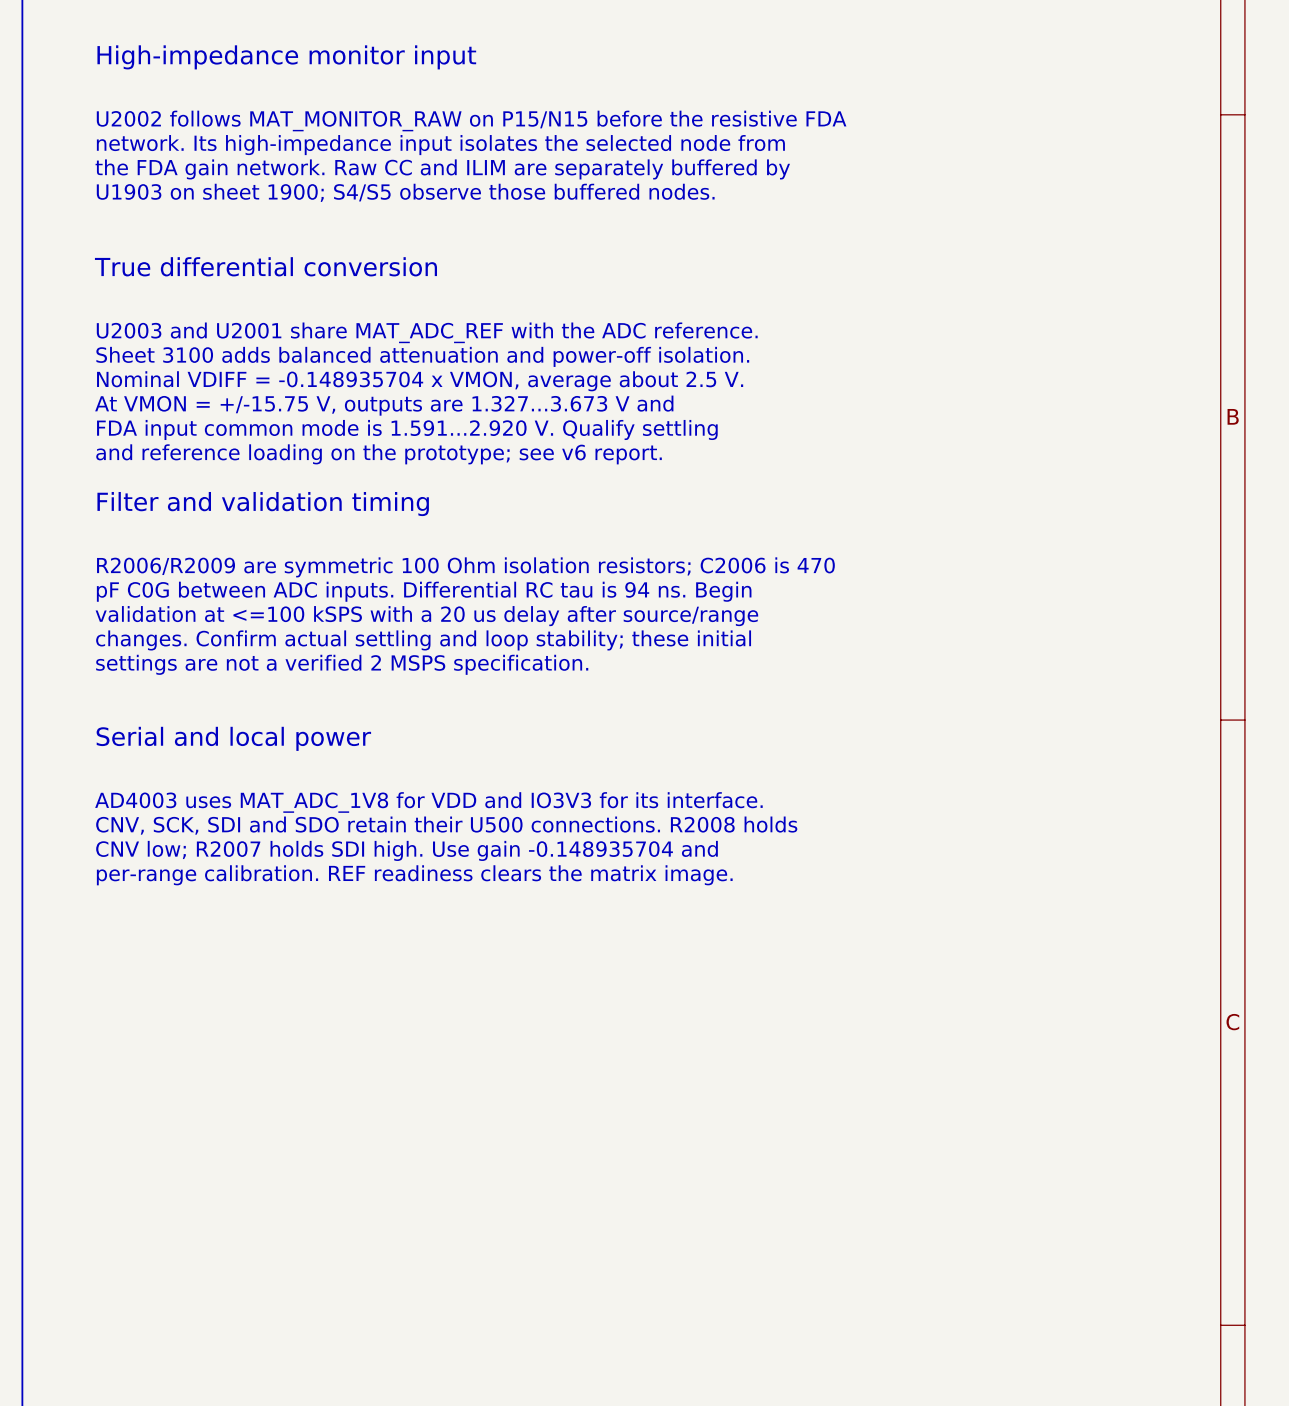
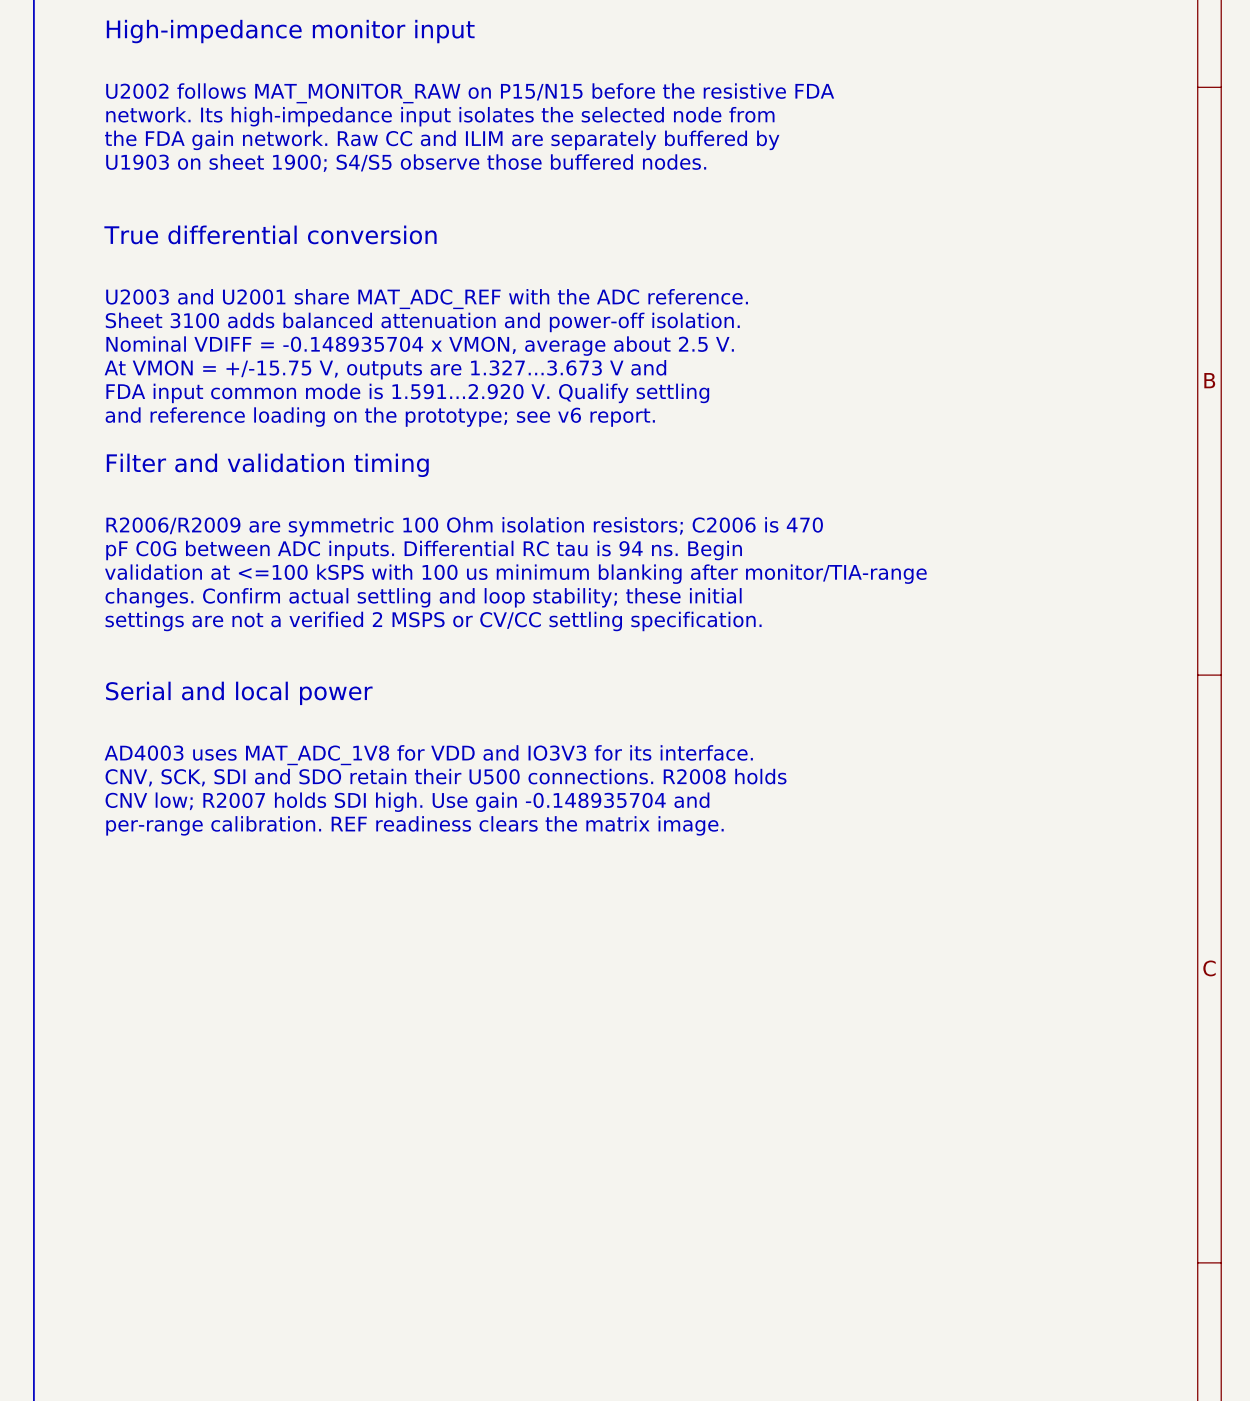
text: validation at <=100 kSPS with a 20 us delay after source/range (426, 616) -> validation at <=100 kSPS with 100 us minimum blanking after monitor/TIA-range (515, 574)
text: settings are not a verified 2 MSPS specification. (342, 664) -> settings are not a verified 2 MSPS or CV/CC settling specification. (433, 621)

